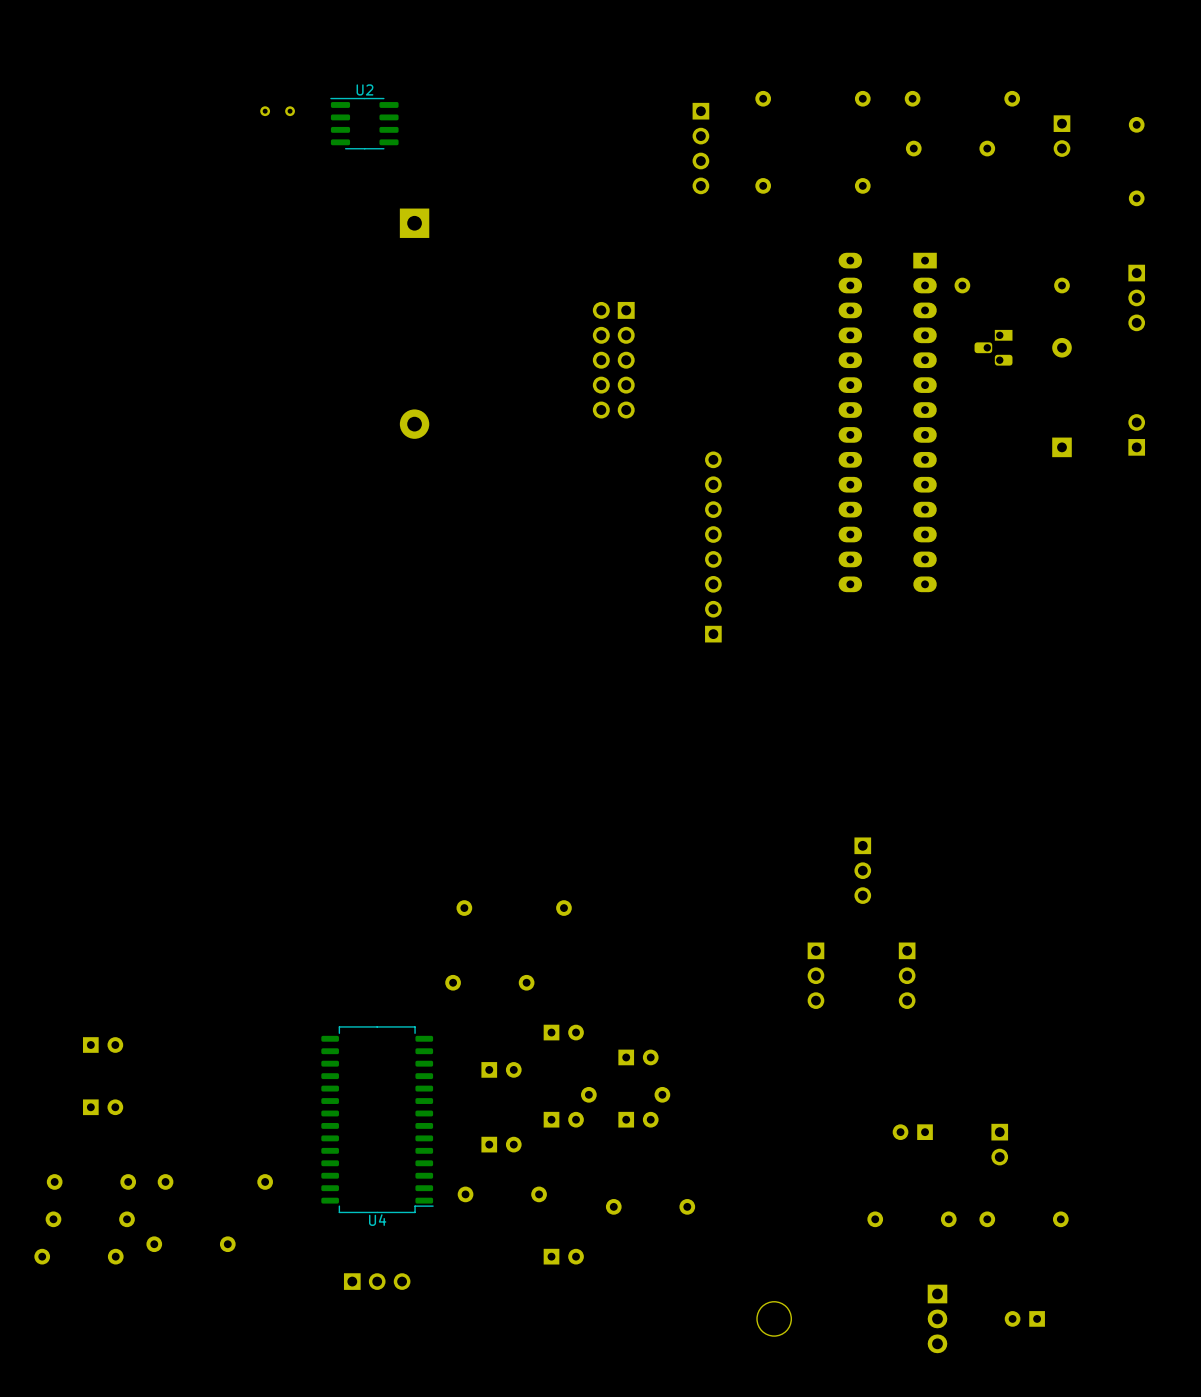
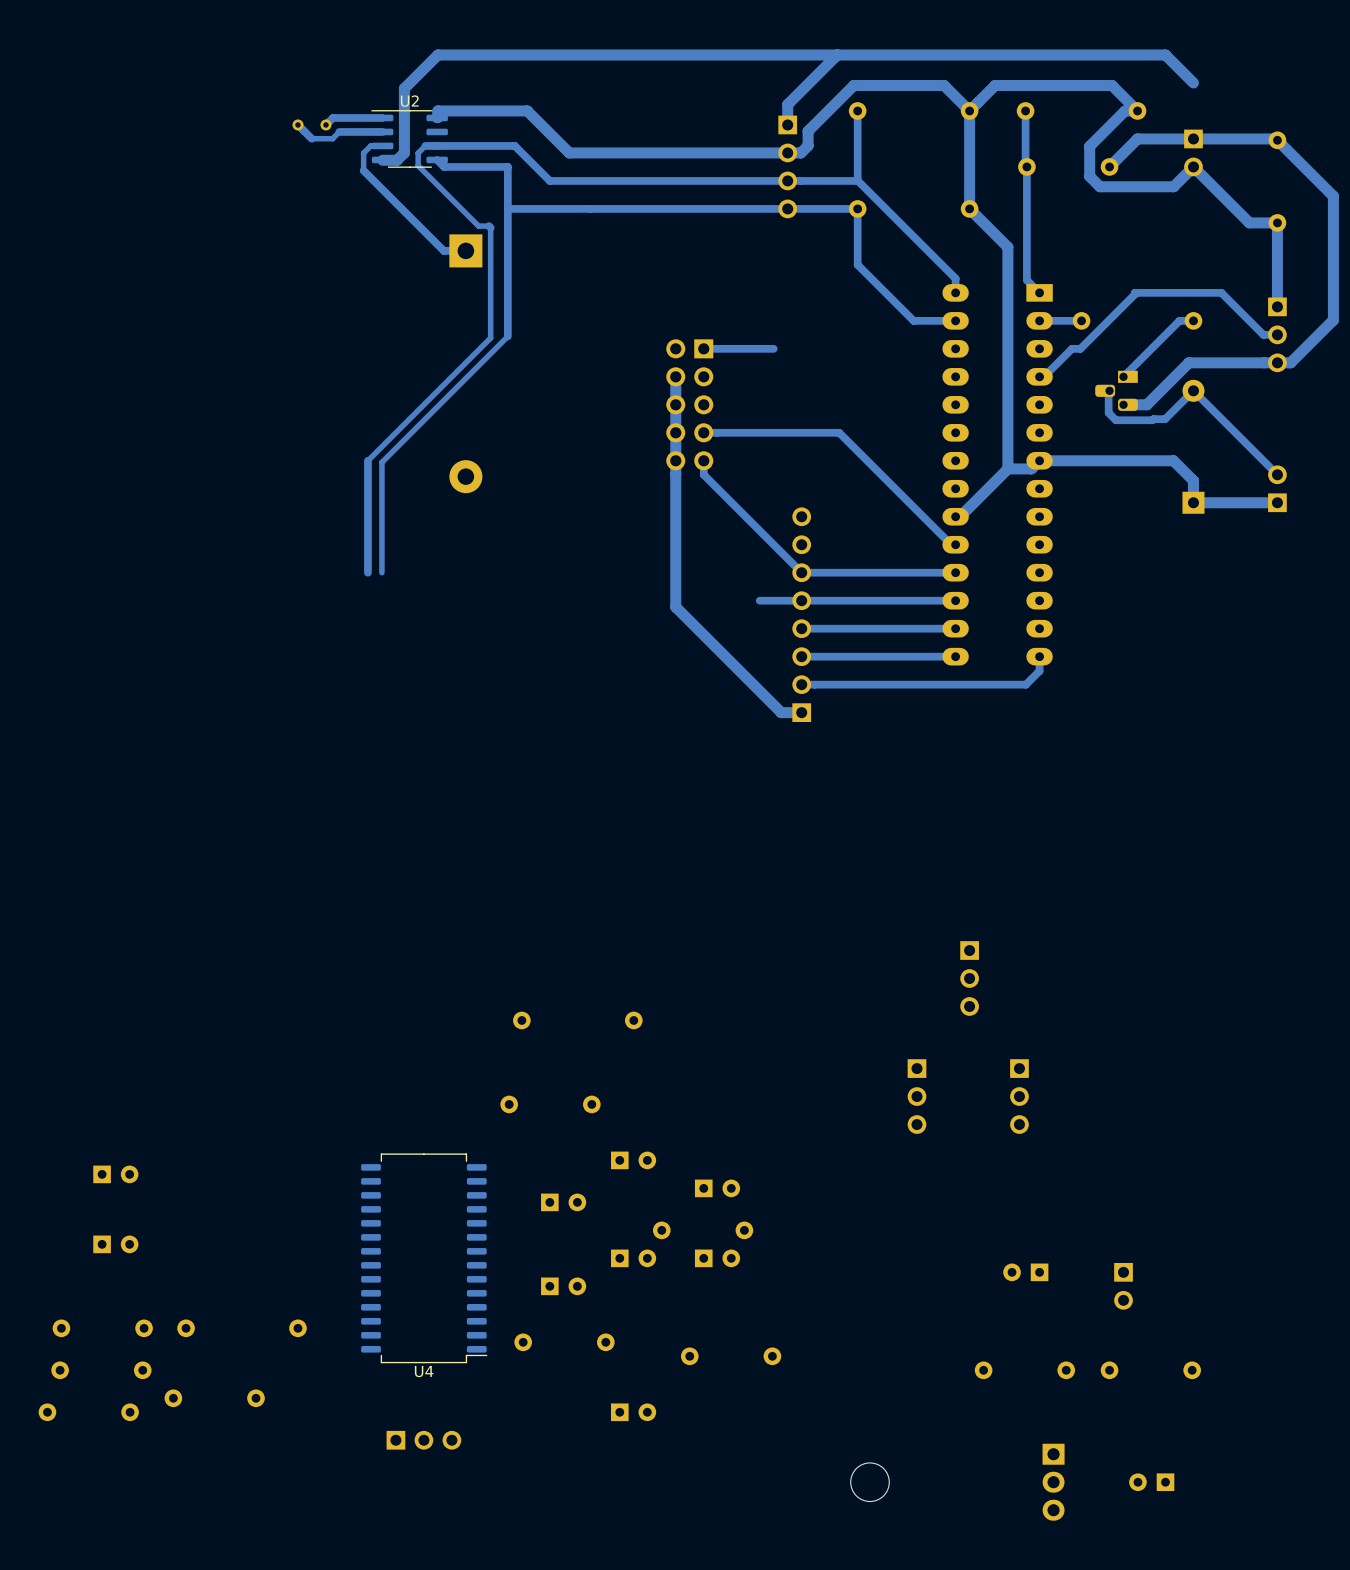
bottom track: none -> (837, 55) (787, 104) (787, 124)
bottom track: none -> (1193, 82) (1165, 55) (437, 55) (404, 88) (404, 152) (396, 160) (382, 160)
bottom track: none -> (857, 110) (857, 180)
bottom track: none -> (969, 110) (969, 208) (1007, 247) (1007, 468)
bottom track: none -> (969, 110) (995, 85) (1112, 85) (1137, 110) (1125, 110) (1089, 146) (1089, 176) (1100, 186) (1173, 186) (1193, 166) (1249, 222) (1277, 222) (1277, 306)
bottom track: none -> (969, 110) (944, 85) (853, 85) (808, 131) (808, 145) (800, 152) (569, 152) (527, 110) (437, 110) (437, 117)
bottom track: none -> (1025, 110) (1026, 280) (1039, 292)
bottom track: none -> (382, 117) (332, 117) (325, 124)
bottom track: none -> (297, 124) (311, 138) (332, 138) (339, 131) (382, 131)
bottom track: none -> (382, 145) (370, 145) (363, 153) (363, 170) (443, 250) (465, 250)
bottom track: none -> (437, 159) (444, 166) (507, 166) (507, 336) (381, 462) (381, 572)
bottom track: none -> (1109, 166) (1137, 138) (1276, 138) (1333, 196) (1333, 320) (1290, 362) (1188, 362) (1146, 404) (1123, 404)
bottom track: none -> (507, 208) (857, 208) (857, 264) (913, 320) (955, 320)
bottom track: none -> (955, 292) (955, 278) (858, 180) (549, 180) (514, 145) (425, 145) (418, 153) (418, 165) (478, 226) (490, 227) (490, 338) (367, 460) (367, 572)
bottom track: none -> (1081, 320) (1039, 320)
bottom track: none -> (1193, 320) (1179, 320) (1123, 376)
bottom track: none -> (1277, 334) (1263, 334) (1221, 292) (1134, 292) (1080, 348) (1071, 348) (1043, 376) (1039, 376)
bottom track: none -> (773, 348) (703, 348)
bottom track: none -> (675, 376) (675, 607) (781, 712) (801, 712)
bottom track: none -> (1109, 390) (1108, 412) (1115, 420) (1165, 419) (1193, 390) (1277, 474)
bottom track: none -> (703, 432) (839, 432) (951, 544) (955, 544)
bottom track: none -> (703, 460) (703, 474) (801, 572) (955, 572)
bottom track: none -> (1007, 468) (1031, 468) (1039, 460) (1173, 460) (1193, 480) (1193, 502) (1277, 502)
bottom track: none -> (1007, 468) (960, 516) (955, 516)
bottom track: none -> (955, 600) (759, 600)
bottom track: none -> (955, 628) (801, 628)
bottom track: none -> (955, 656) (801, 656)
bottom track: none -> (1039, 656) (1039, 670) (1025, 684) (801, 684)

